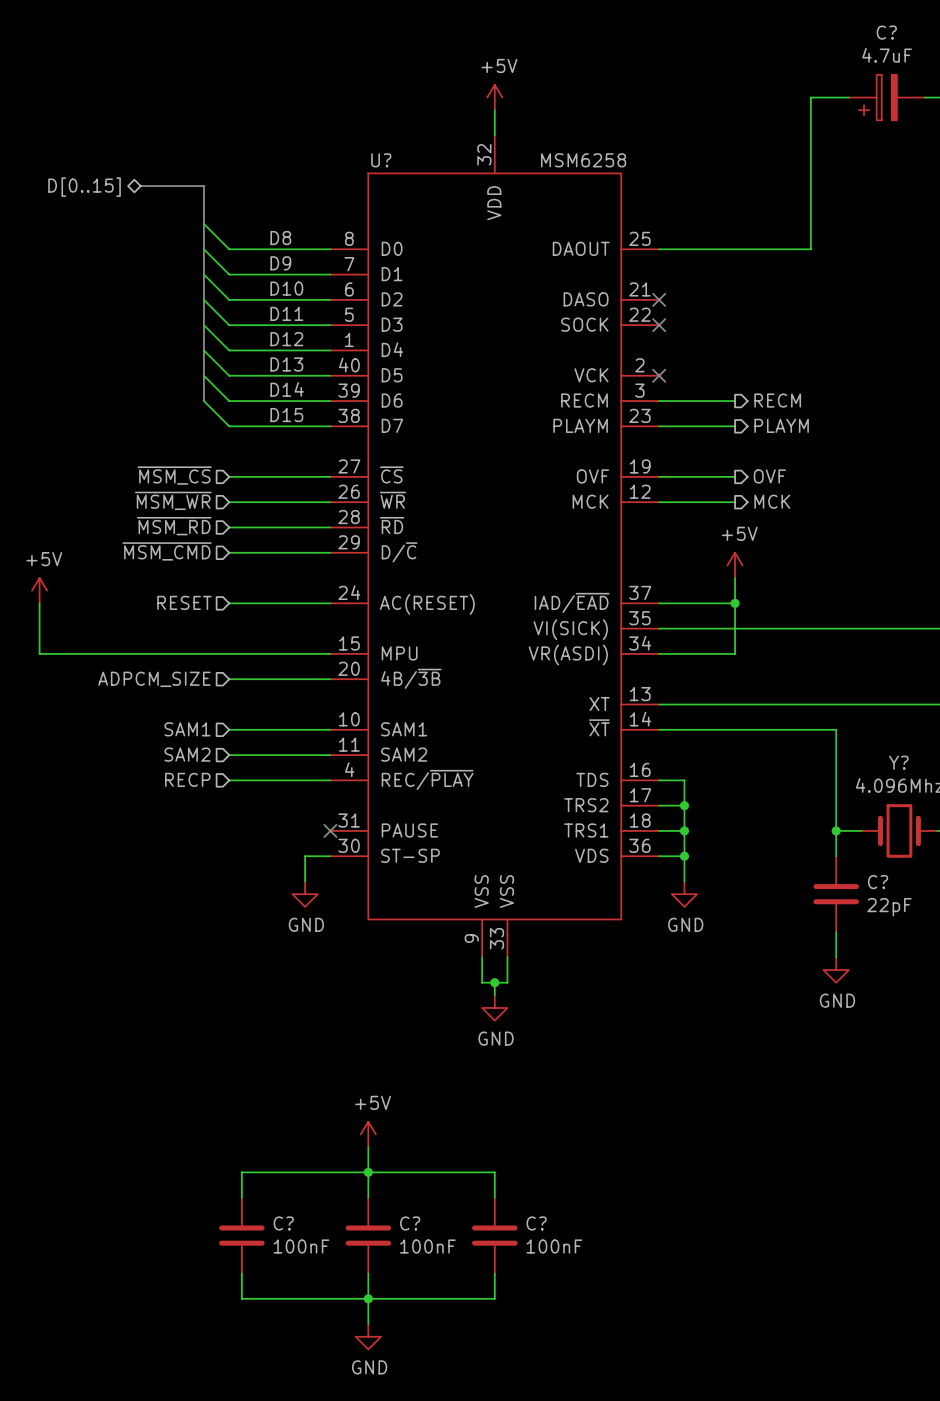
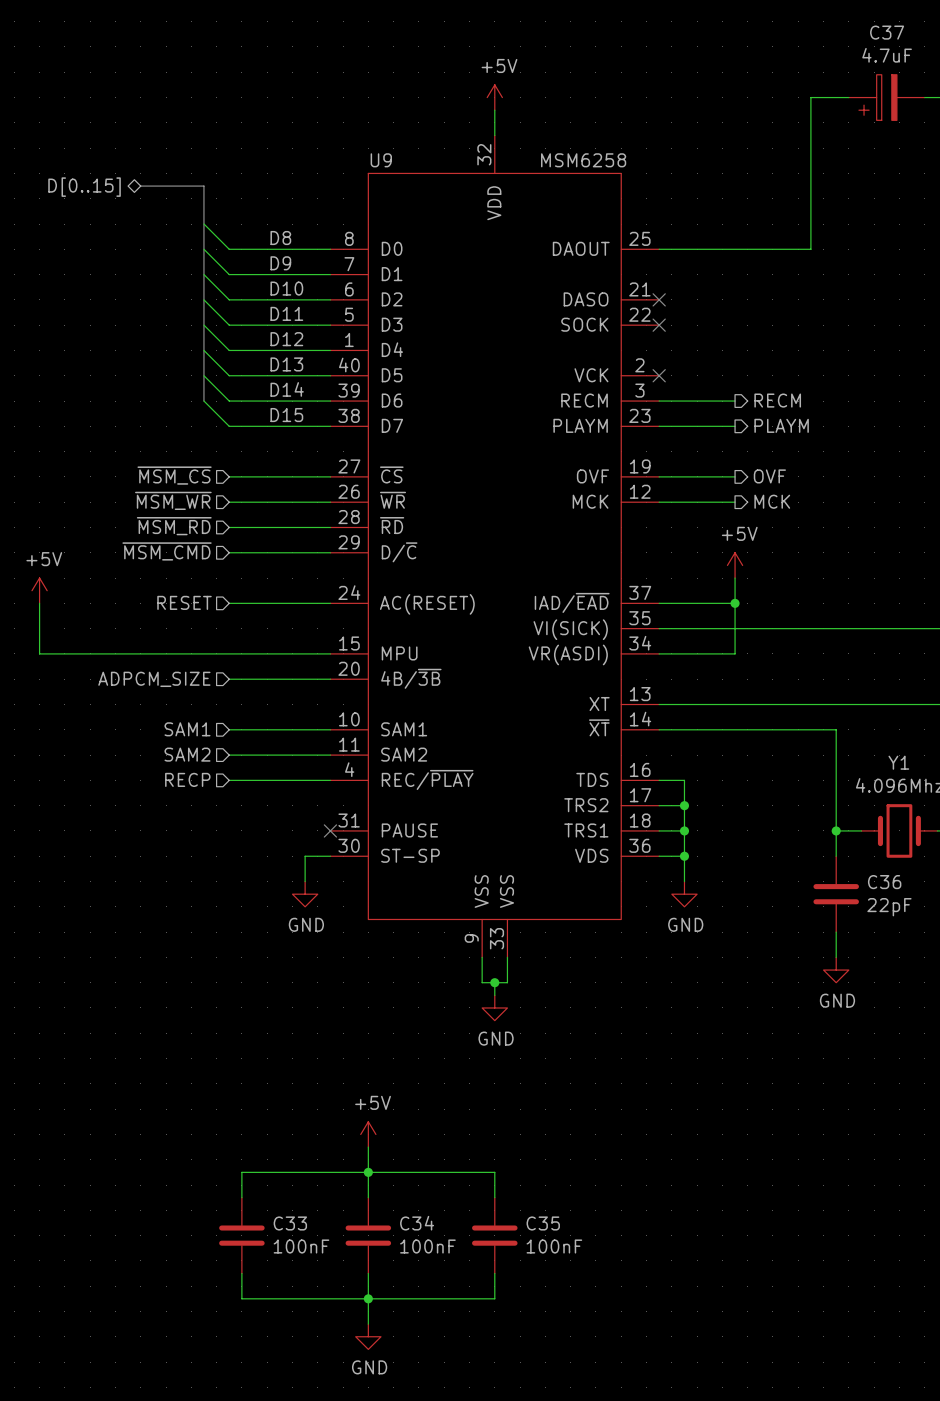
C? name: C? (886, 32) -> C37 (887, 32)
U? name: U? (381, 160) -> U9 (381, 160)
Y? name: Y? (898, 762) -> Y1 (898, 762)
C? name: C? (878, 882) -> C36 (884, 882)
C? name: C? (283, 1223) -> C33 (290, 1223)
C? name: C? (410, 1223) -> C34 (417, 1223)
C? name: C? (536, 1223) -> C35 (543, 1223)

